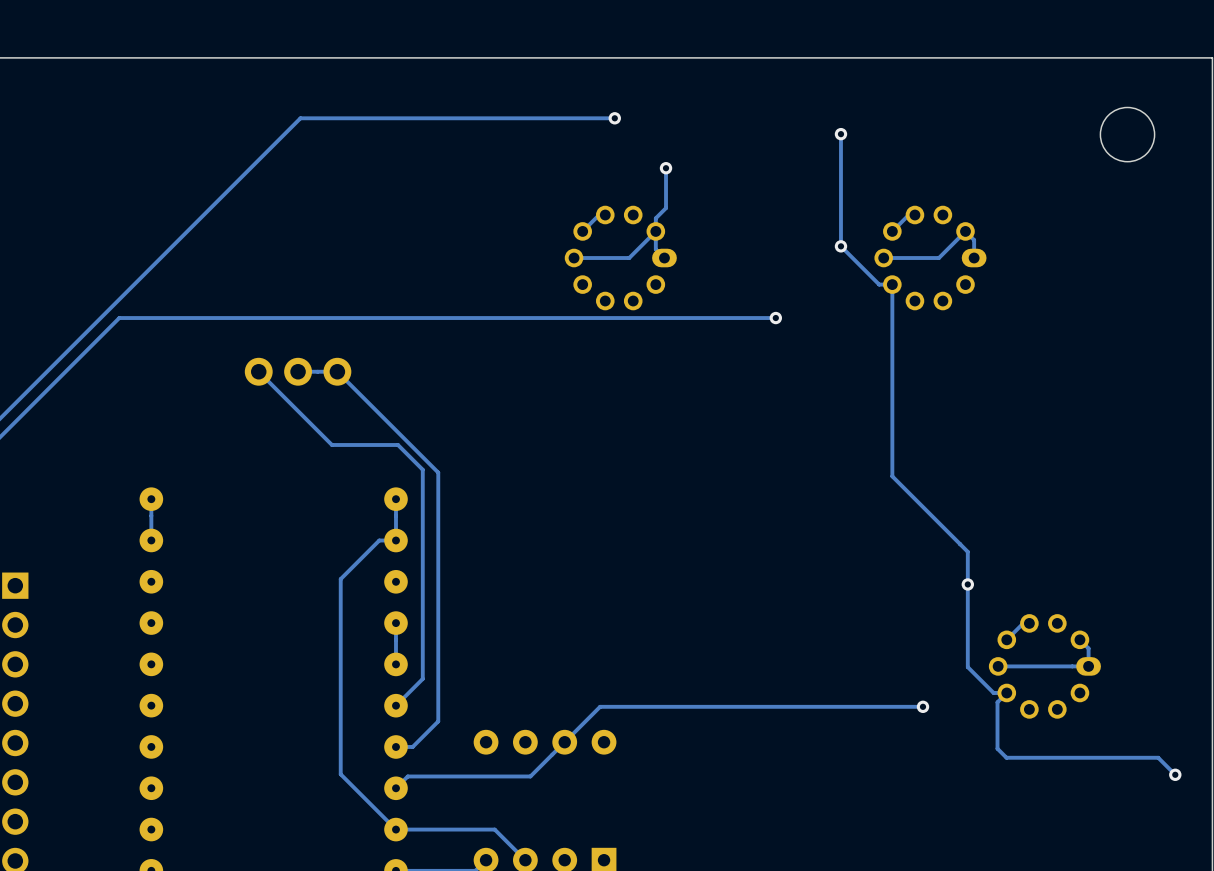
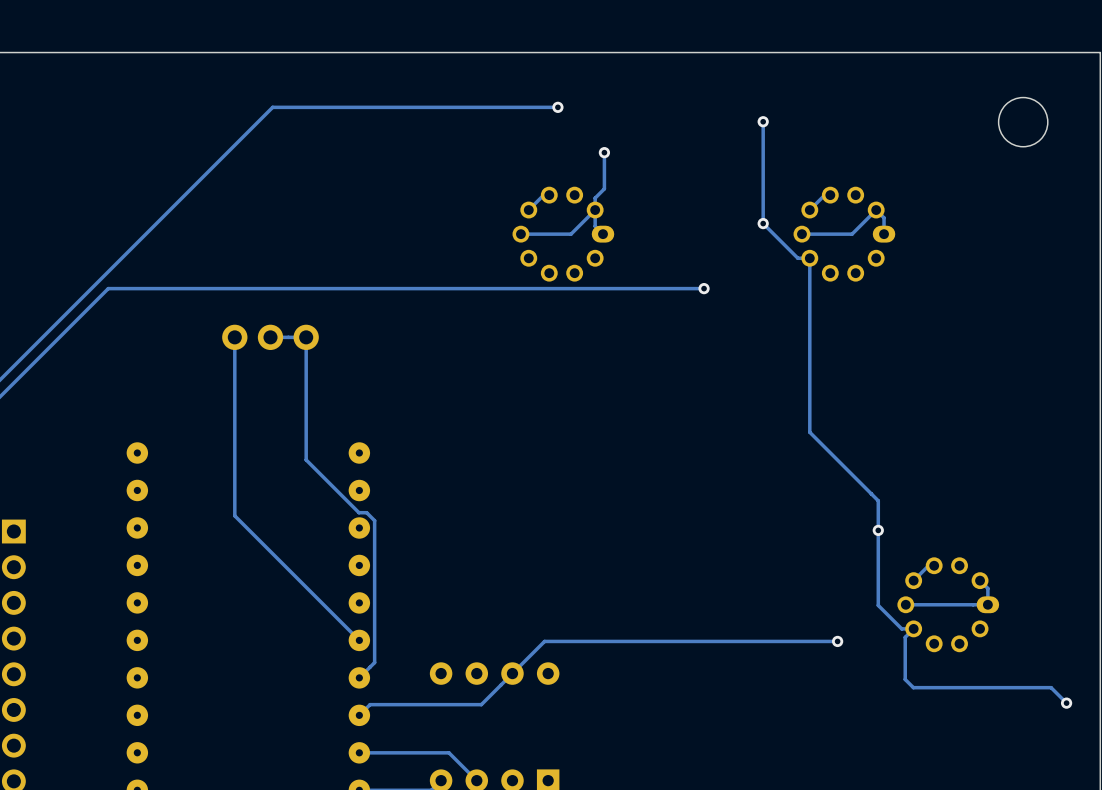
track: (258, 371) (331, 444) (398, 444) (422, 469) (422, 678) (395, 705) -> (234, 337) (234, 515) (359, 640)
track: (337, 371) (438, 472) (438, 721) (412, 746) (395, 746) -> (306, 337) (306, 459) (358, 512) (366, 512) (374, 520) (374, 662) (359, 677)
track: (151, 499) (151, 540) -> none
track: (395, 499) (395, 540) (379, 540) (340, 579) (340, 774) (395, 829) -> none
track: (395, 623) (395, 664) -> none

